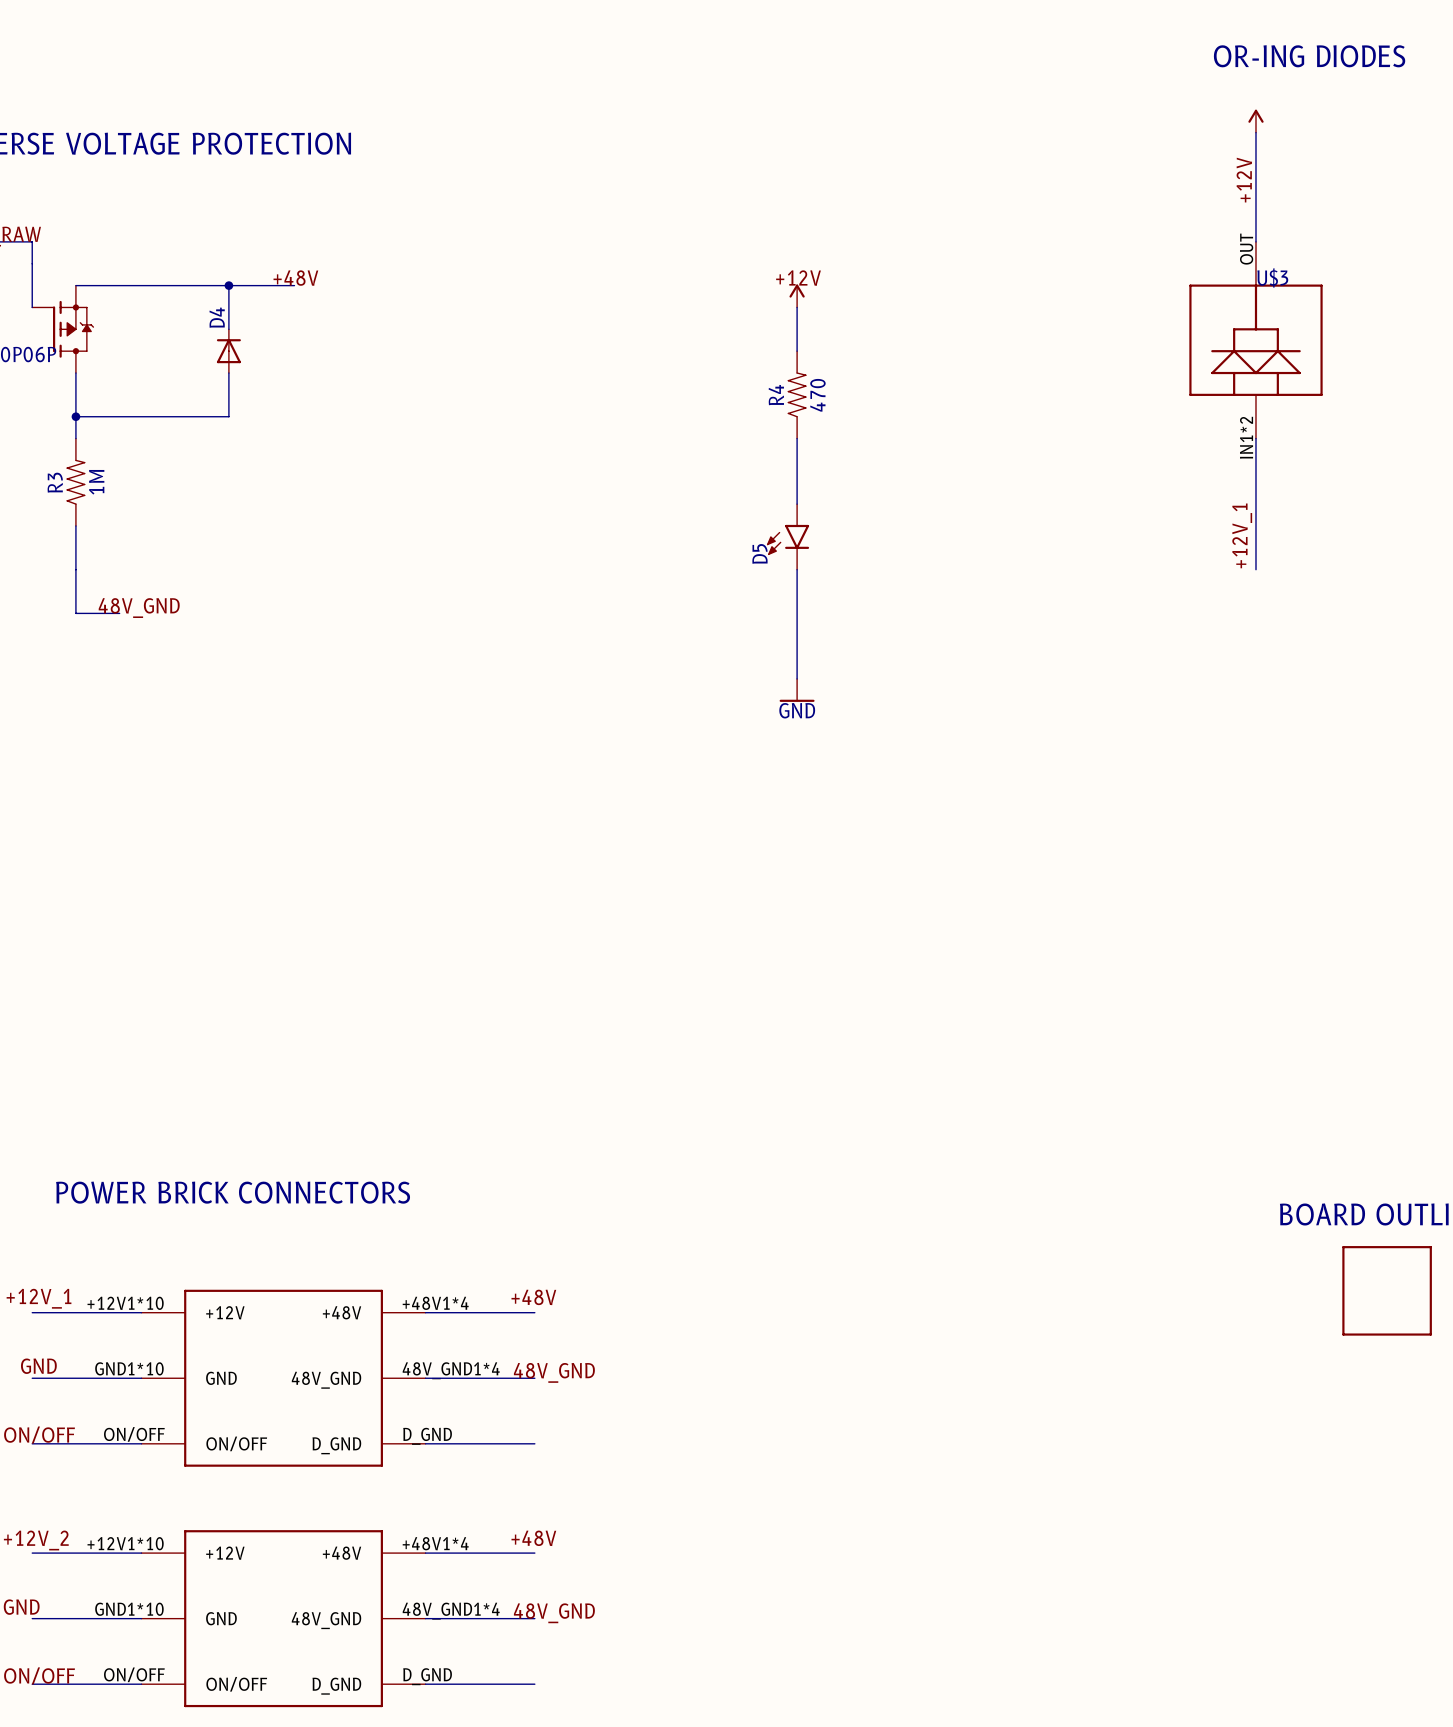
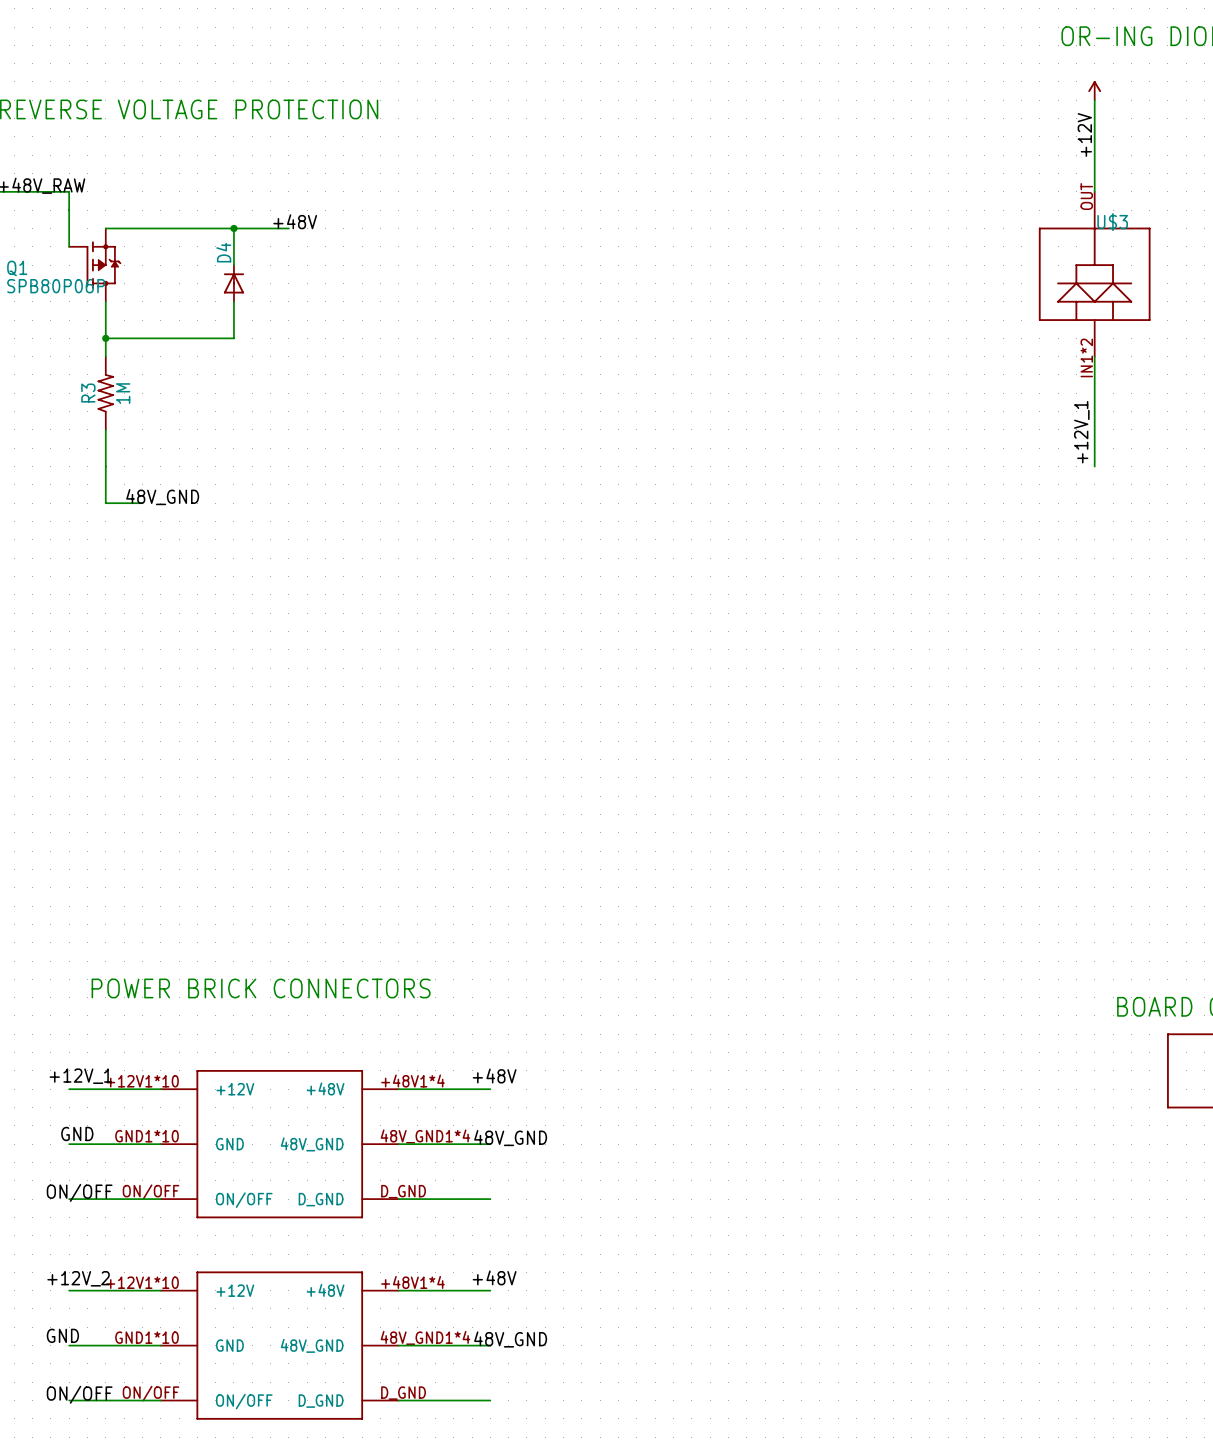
label: +12V (798, 278) -> none
power symbol: (797, 295) -> none
wire: (797, 307) (797, 351) -> none
R4: 470 (797, 394) -> none
wire: (797, 438) (797, 504) -> none
D5: (788, 536) -> none
wire: (797, 569) (797, 678) -> none
power symbol: GND (797, 690) -> none

